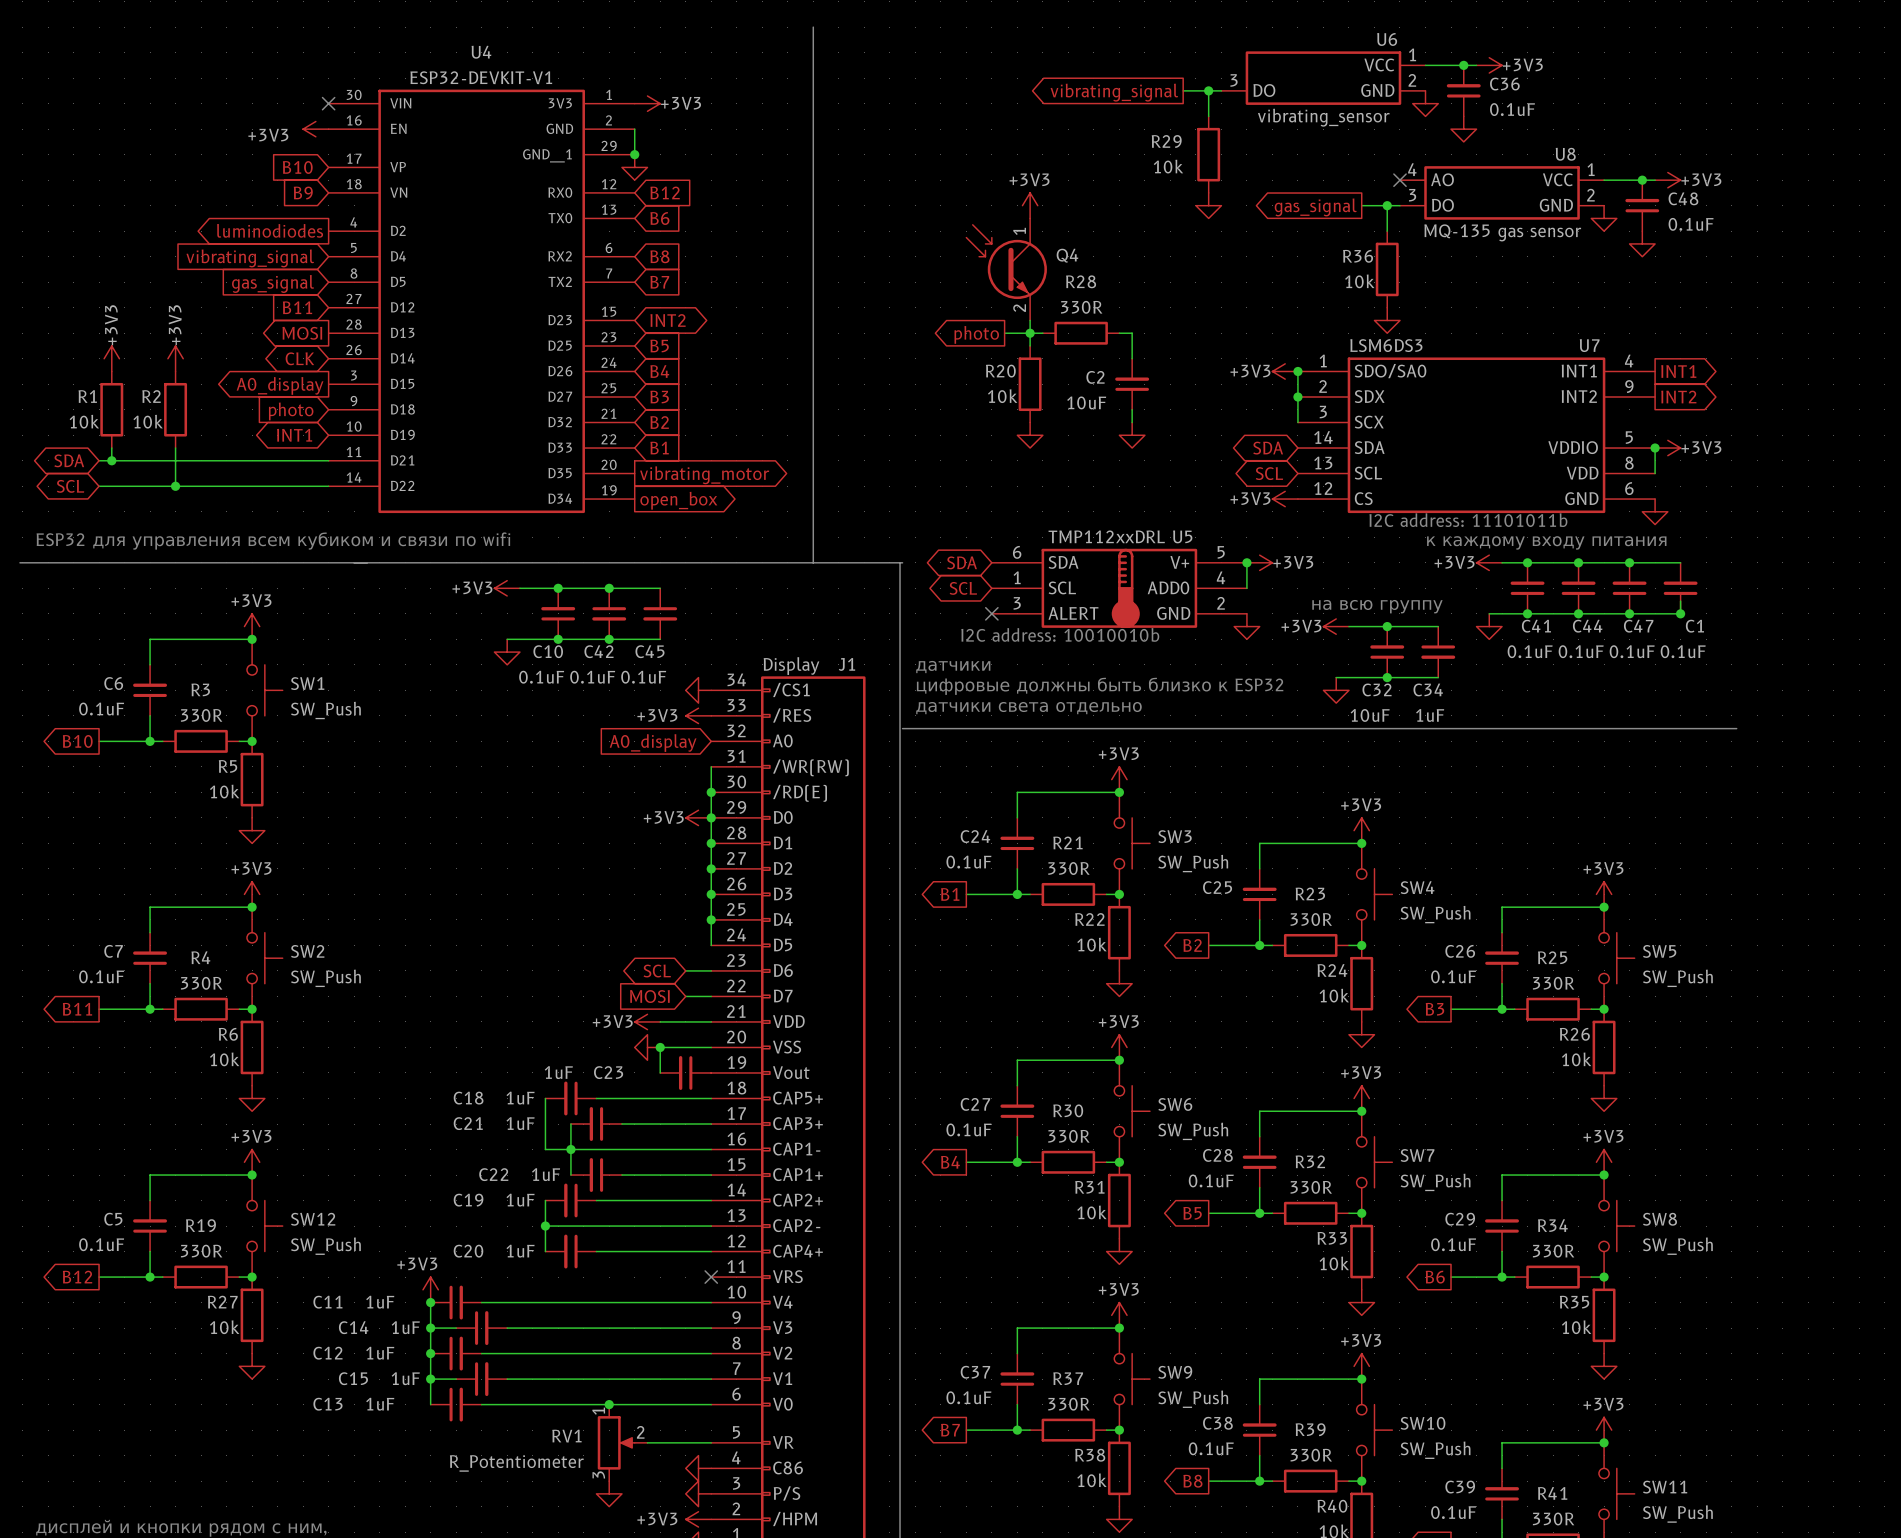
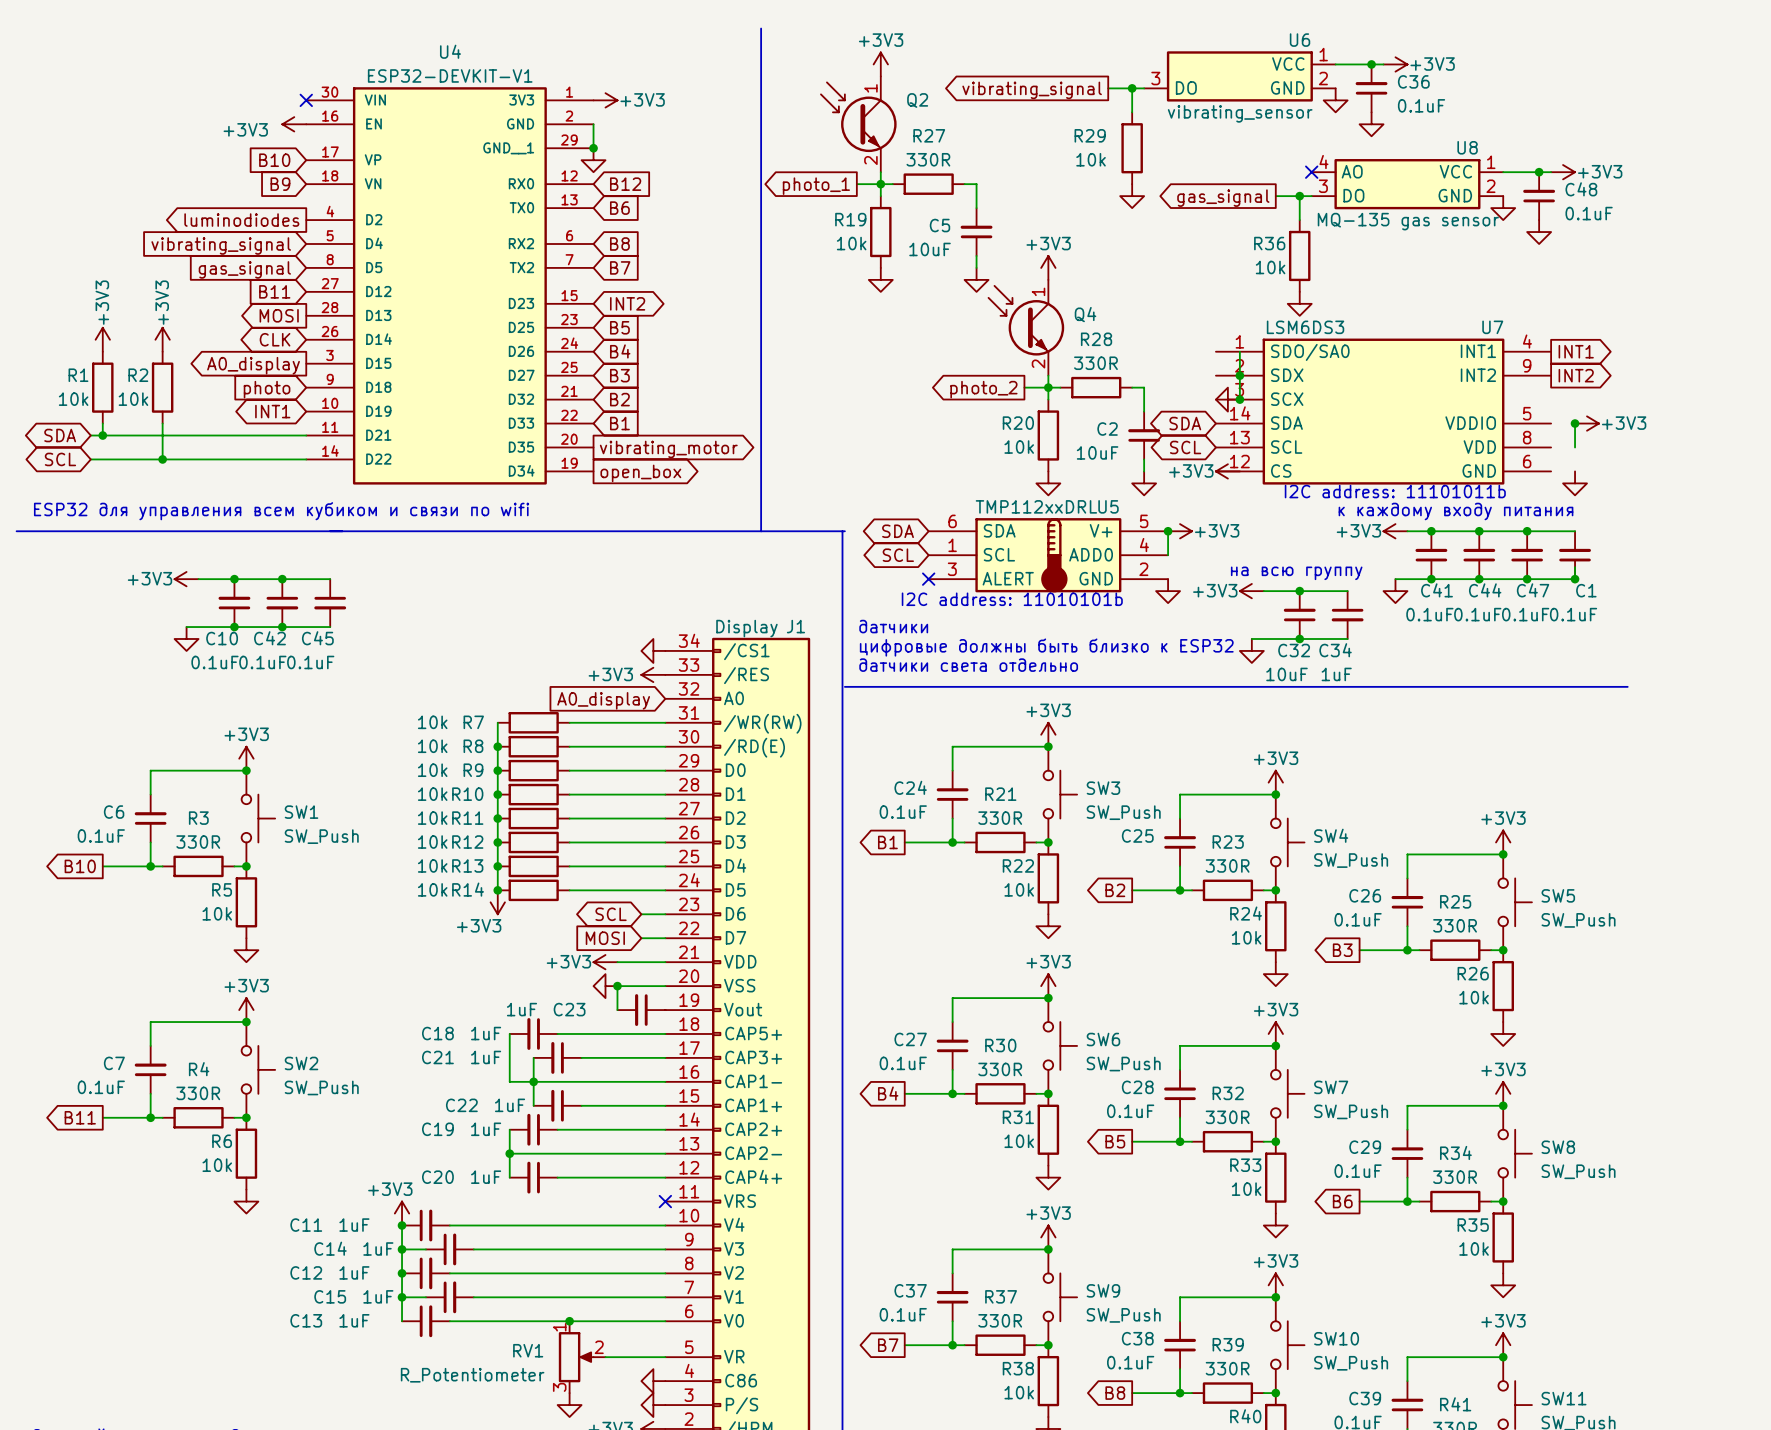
power symbol: none -> +3V3 (880, 64)
Q2: none -> (858, 124)
wire: none -> (880, 172) (880, 196)
junction: none -> (880, 184)
wire: none -> (964, 184) (976, 184) (976, 208)
global label: none -> photo_1 (816, 186)
power symbol: +3V3 (1030, 205) -> none
Q4 position: (1006, 269) -> (1026, 327)
wire: none -> (976, 255) (976, 267)
power symbol: none -> +3V3 (1048, 267)
power symbol: none -> (880, 279)
power symbol: none -> (976, 279)
wire: (1030, 320) (1030, 345) -> (1048, 375) (1048, 399)
wire: (1004, 333) (1042, 333) -> (856, 184) (892, 184)
junction: (1030, 333) -> none
R28 position: (1081, 333) -> (1096, 387)
wire: (1119, 333) (1132, 333) (1132, 358) -> (1132, 387) (1144, 387) (1144, 411)
global label: photo (976, 334) -> none
power symbol: +3V3 (1285, 371) -> none
wire: (1297, 371) (1297, 422) -> (1239, 351) (1239, 399)
junction: (1297, 371) -> none
R20 position: (1030, 384) -> (1048, 435)
C2 position: (1132, 384) -> (1144, 435)
junction: (1297, 397) -> none
junction: none -> (1239, 375)
junction: none -> (1048, 387)
wire: (1132, 409) (1132, 422) -> (1060, 387) (1024, 387)
global label: none -> photo_2 (983, 389)
power symbol: none -> (1227, 399)
junction: none -> (1239, 399)
power symbol: (1030, 435) -> none
power symbol: (1132, 435) -> none
wire: (1655, 448) (1655, 473) -> (1575, 423) (1575, 447)
junction position: (1655, 448) -> (1575, 423)
power symbol position: +3V3 (1667, 448) -> +3V3 (1587, 423)
wire: none -> (1144, 459) (1144, 471)
power symbol position: +3V3 (1285, 499) -> +3V3 (1227, 471)
power symbol: none -> (1048, 483)
power symbol: none -> (1144, 483)
power symbol position: (1655, 511) -> (1575, 483)
power symbol: +3V3 (507, 588) -> none
wire: (519, 588) (660, 588) -> none
junction: (558, 588) -> none
junction: (609, 588) -> none
wire: none -> (198, 579) (330, 579)
junction: none -> (234, 579)
junction: none -> (282, 579)
C10 position: (558, 613) -> (234, 603)
C42 position: (609, 613) -> (282, 603)
C45 position: (660, 613) -> (330, 603)
power symbol rotation: 0° (252, 626) -> 90° counterclockwise (186, 579)
power symbol position: +3V3 (252, 626) -> +3V3 (186, 579)
text: I2C address: 10010010b (1060, 634) -> I2C address: 11010101b (1012, 599)
wire: (252, 639) (150, 639) (150, 664) -> none
junction: (252, 639) -> none
wire: (507, 639) (660, 639) -> none
junction: (558, 639) -> none
junction: (609, 639) -> none
power symbol: (507, 652) -> none
wire: none -> (186, 627) (330, 627)
junction: none -> (234, 627)
junction: none -> (282, 627)
power symbol: none -> (186, 638)
C6 position: (150, 690) -> (150, 818)
SW1 position: (264, 690) -> (258, 818)
wire: (150, 715) (150, 741) -> none
global label position: B10 (77, 741) -> B10 (80, 866)
wire: (99, 741) (162, 741) -> none
junction: (150, 741) -> none
R3 position: (201, 741) -> (198, 866)
wire: (239, 741) (252, 741) -> none
junction: (252, 741) -> none
wire: none -> (497, 722) (497, 890)
R7: none -> (533, 722)
wire: (711, 766) (711, 945) -> (665, 722) (569, 722)
R5 position: (252, 779) -> (246, 902)
junction: none -> (497, 746)
R8: none -> (533, 746)
wire: none -> (569, 746) (665, 746)
junction: (711, 792) -> none
power symbol: none -> +3V3 (246, 758)
junction: none -> (246, 770)
junction: none -> (497, 770)
R9: none -> (533, 770)
wire: none -> (569, 770) (665, 770)
power symbol: +3V3 (698, 817) -> none
junction: (711, 817) -> none
power symbol: (252, 830) -> none
junction: none -> (497, 794)
R10: none -> (533, 794)
wire: none -> (569, 794) (665, 794)
junction: (711, 843) -> none
junction: none -> (497, 818)
R11: none -> (533, 818)
wire: none -> (569, 818) (665, 818)
junction: (711, 868) -> none
power symbol: +3V3 (252, 894) -> none
junction: none -> (497, 842)
R12: none -> (533, 842)
wire: none -> (569, 842) (665, 842)
junction: (711, 894) -> none
wire: (252, 907) (150, 907) (150, 932) -> (246, 770) (150, 770) (150, 794)
junction position: (252, 907) -> (246, 866)
junction: none -> (150, 866)
junction: none -> (497, 866)
R13: none -> (533, 866)
wire: none -> (569, 866) (665, 866)
junction: (711, 919) -> none
junction: none -> (497, 890)
R14: none -> (533, 890)
wire: none -> (569, 890) (665, 890)
C7 position: (150, 958) -> (150, 1069)
SW2 position: (264, 958) -> (258, 1069)
power symbol: none -> +3V3 (497, 902)
wire: (150, 983) (150, 1009) -> (150, 842) (150, 866)
global label position: B11 (77, 1009) -> B11 (80, 1117)
wire: (99, 1009) (162, 1009) -> (102, 866) (162, 866)
junction: (150, 1009) -> none
R4 position: (201, 1009) -> (198, 1117)
wire: (239, 1009) (252, 1009) -> (234, 866) (246, 866)
junction: (252, 1009) -> none
power symbol: none -> (246, 950)
R6 position: (252, 1047) -> (246, 1153)
power symbol: none -> +3V3 (246, 1010)
junction: none -> (246, 1022)
power symbol: (252, 1098) -> none
power symbol: +3V3 (252, 1162) -> none
wire: (252, 1175) (150, 1175) (150, 1200) -> (246, 1022) (150, 1022) (150, 1045)
junction position: (252, 1175) -> (246, 1117)
junction: none -> (150, 1117)
R19 name position: R19 (200, 1225) -> R19 (850, 219)
C5 position: (150, 1226) -> (976, 232)
SW12: SW_Push (264, 1226) -> none
C5 text: 0.1uF (101, 1244) -> 10uF (930, 249)
wire: (150, 1251) (150, 1277) -> (150, 1093) (150, 1117)
R19 text: 330R (201, 1251) -> 10k (851, 243)
global label: B12 (77, 1277) -> none
wire: (99, 1277) (162, 1277) -> (102, 1117) (162, 1117)
junction: (150, 1277) -> none
R19 rotation: 0° (201, 1277) -> 90° clockwise (880, 232)
R19 position: (201, 1277) -> (880, 232)
wire: (239, 1277) (252, 1277) -> (234, 1117) (246, 1117)
junction: (252, 1277) -> none
power symbol: none -> (246, 1201)
R27 name position: R27 (222, 1302) -> R27 (929, 135)
R27 rotation: 0° (252, 1315) -> 90° clockwise (928, 184)
R27 position: (252, 1315) -> (928, 184)
R27 text: 10k (224, 1327) -> 330R (928, 159)
power symbol: (252, 1366) -> none

